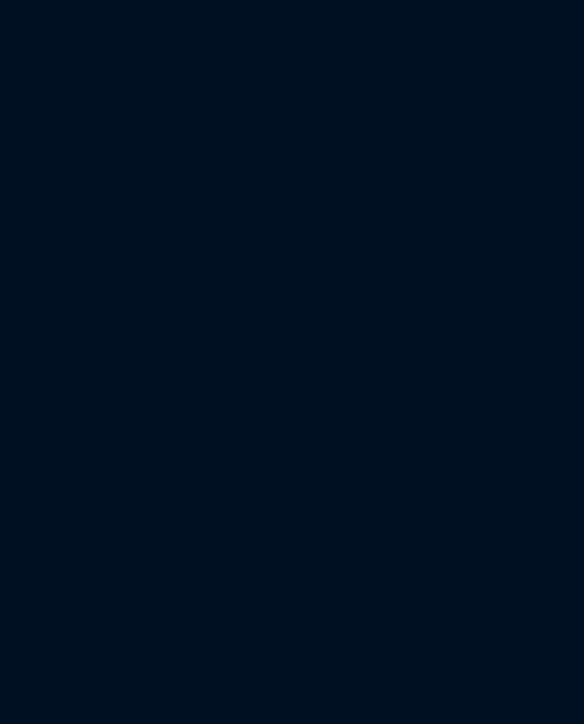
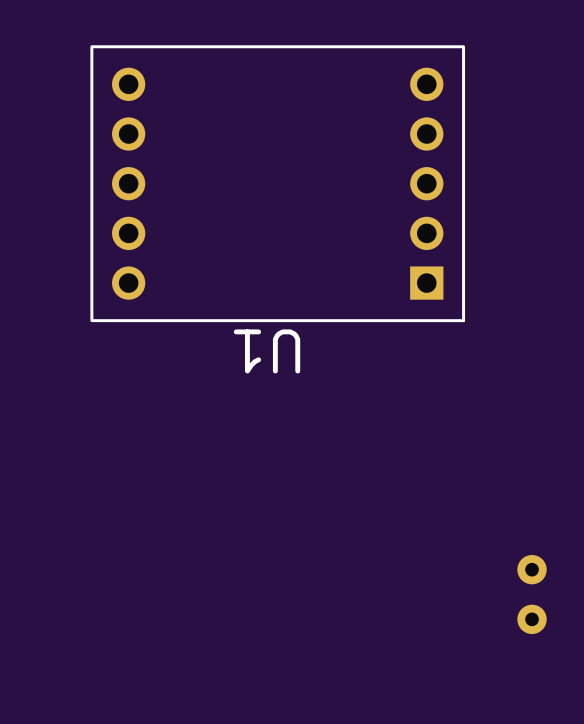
U1: none -> (277, 183)
part: none -> (532, 594)

